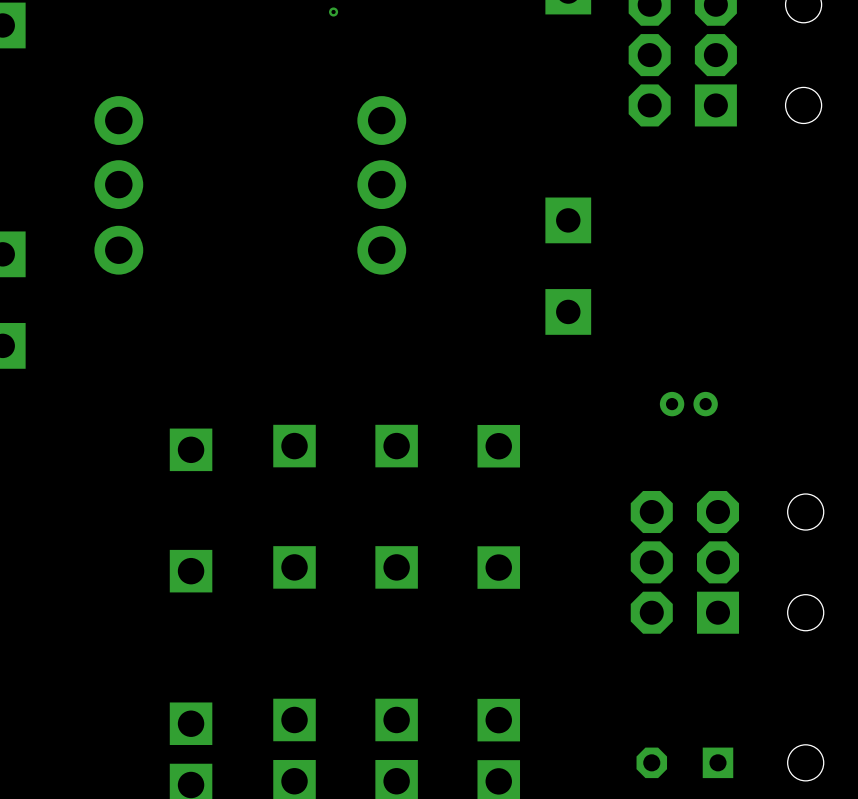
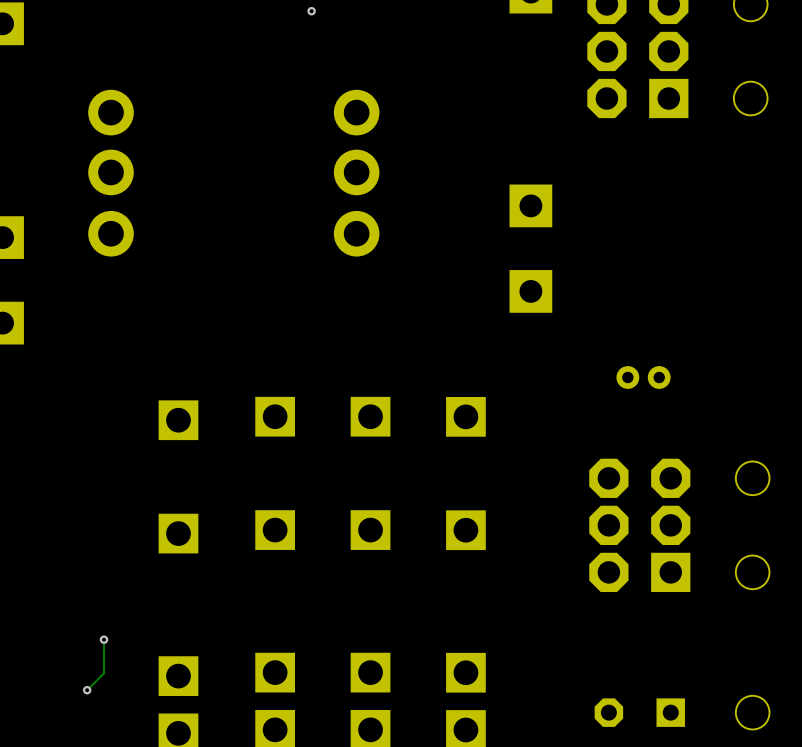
track: none -> (103, 639) (103, 673) (87, 690)
via: none -> (103, 639)
via: none -> (87, 690)

